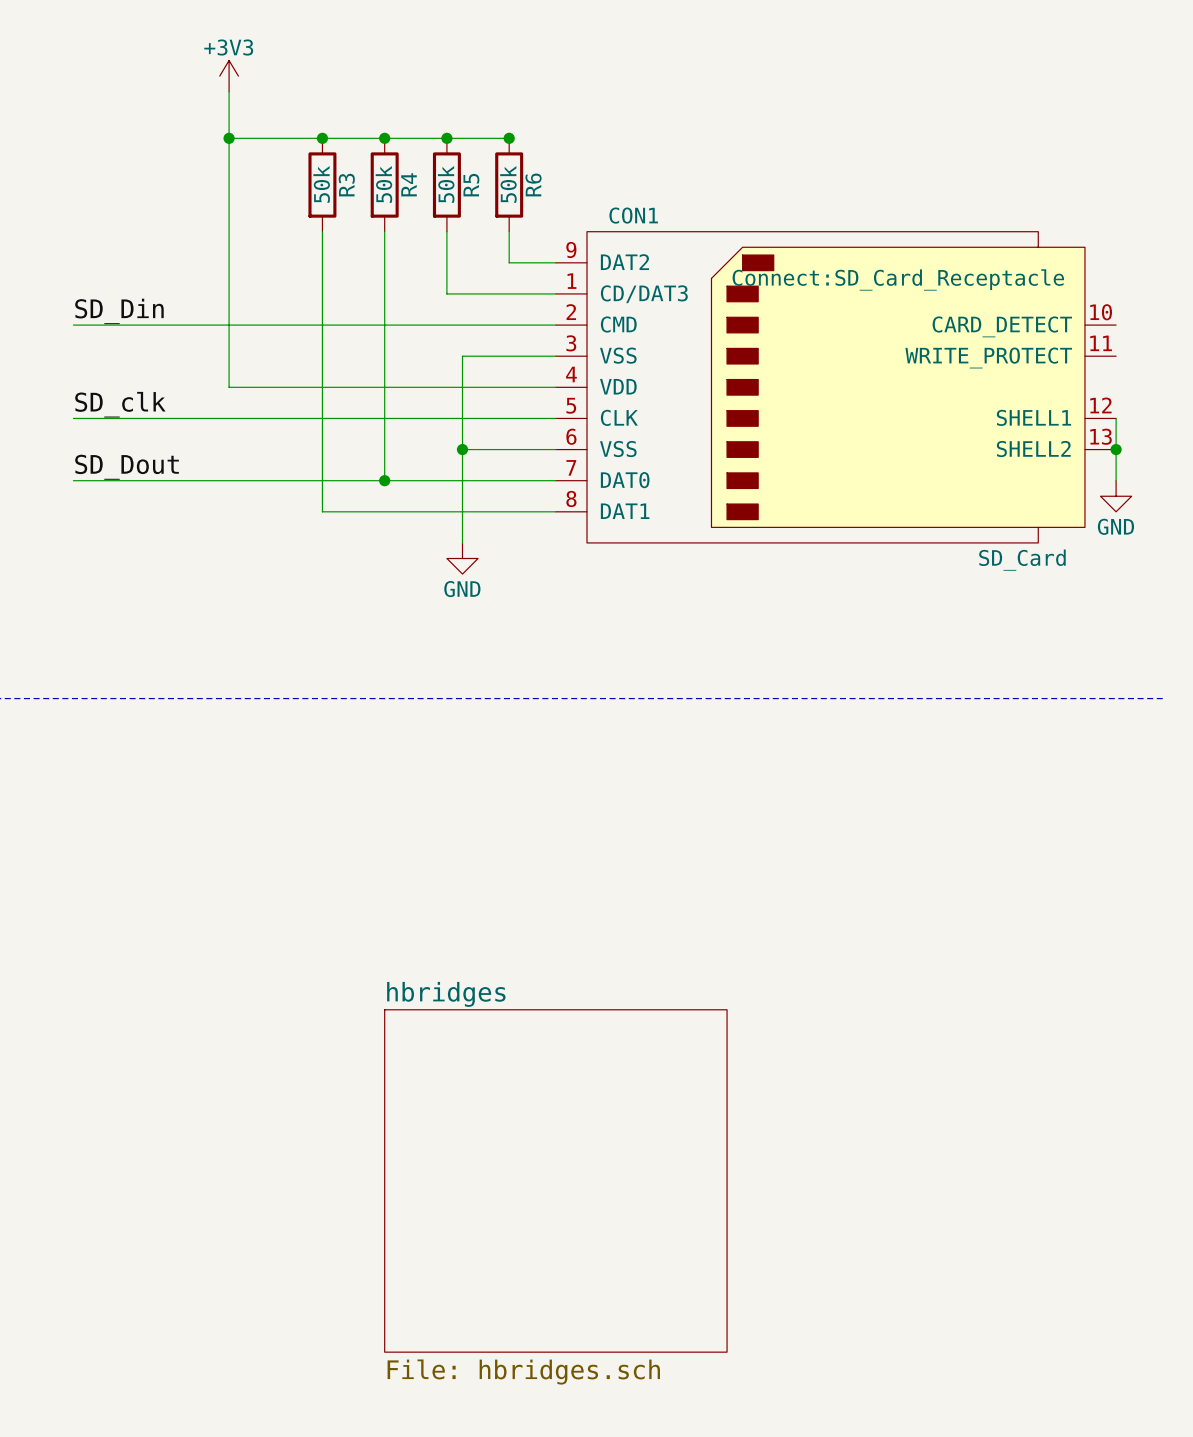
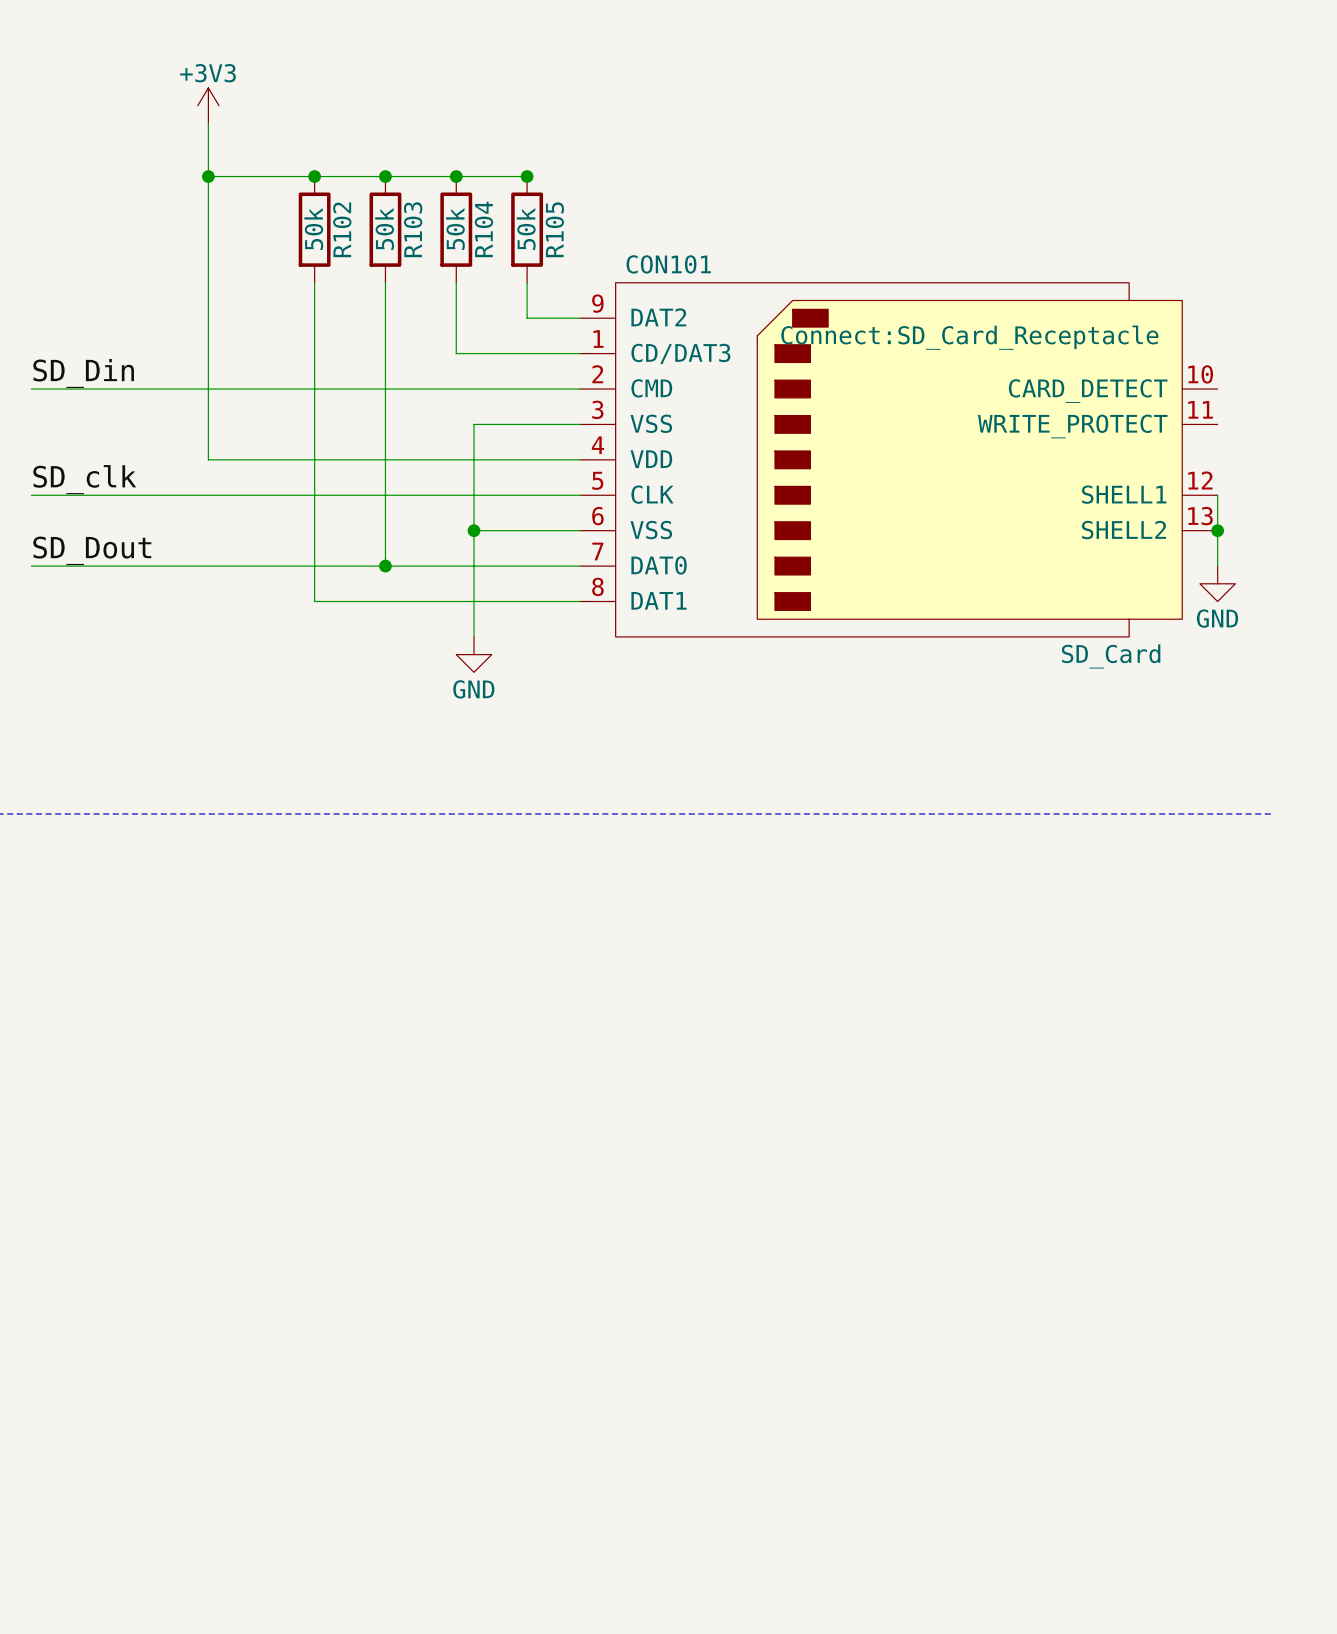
R4 name: R4 (409, 184) -> R103 (413, 229)
R6 name: R6 (533, 184) -> R105 (554, 229)
R3 name: R3 (346, 185) -> R102 (342, 229)
R5 name: R5 (471, 185) -> R104 (483, 229)
CON1 name: CON1 (633, 215) -> CON101 (668, 264)
sheet hbridges: File: hbridges.sch (555, 1180) -> none

